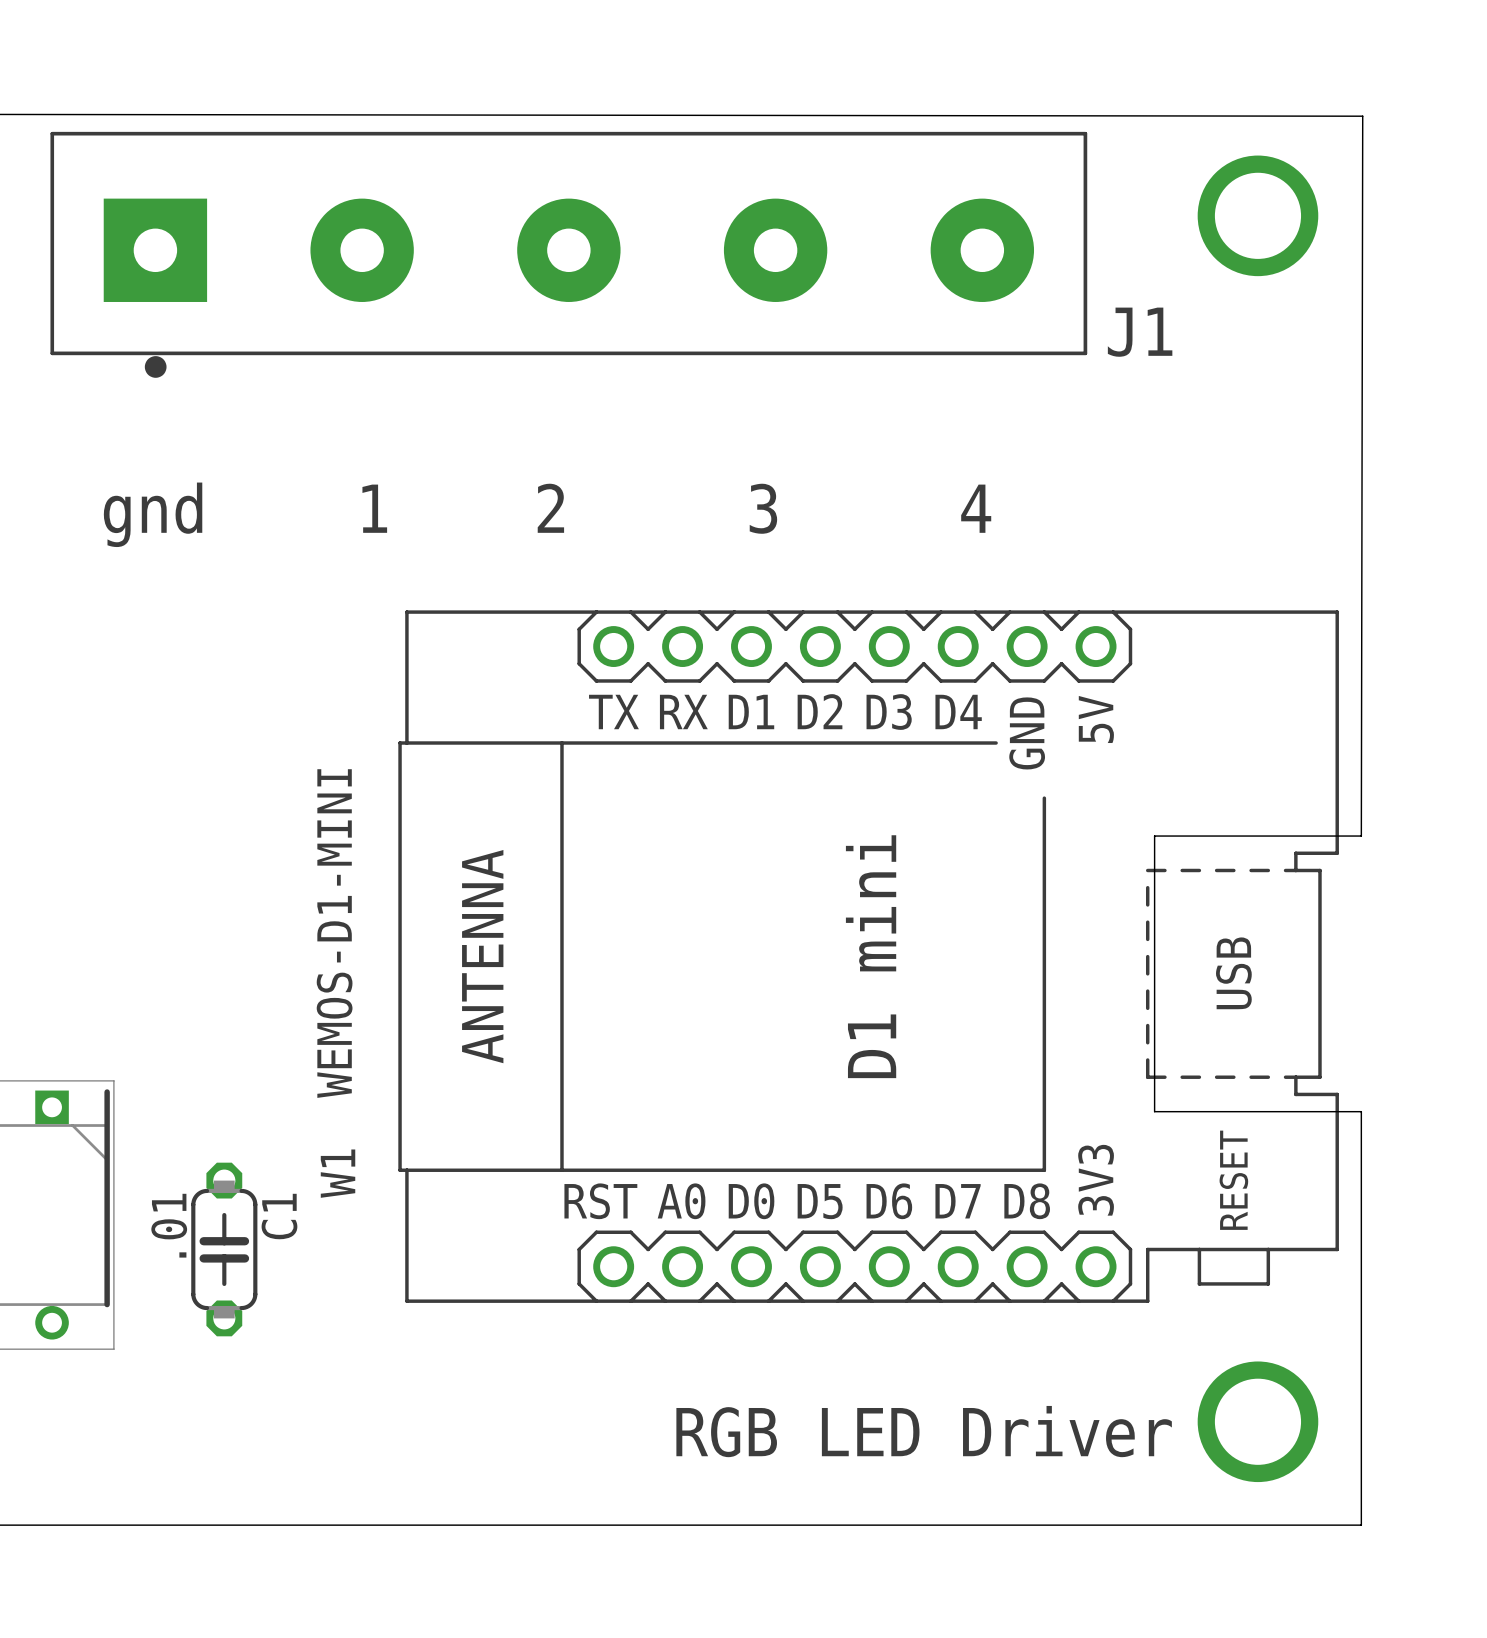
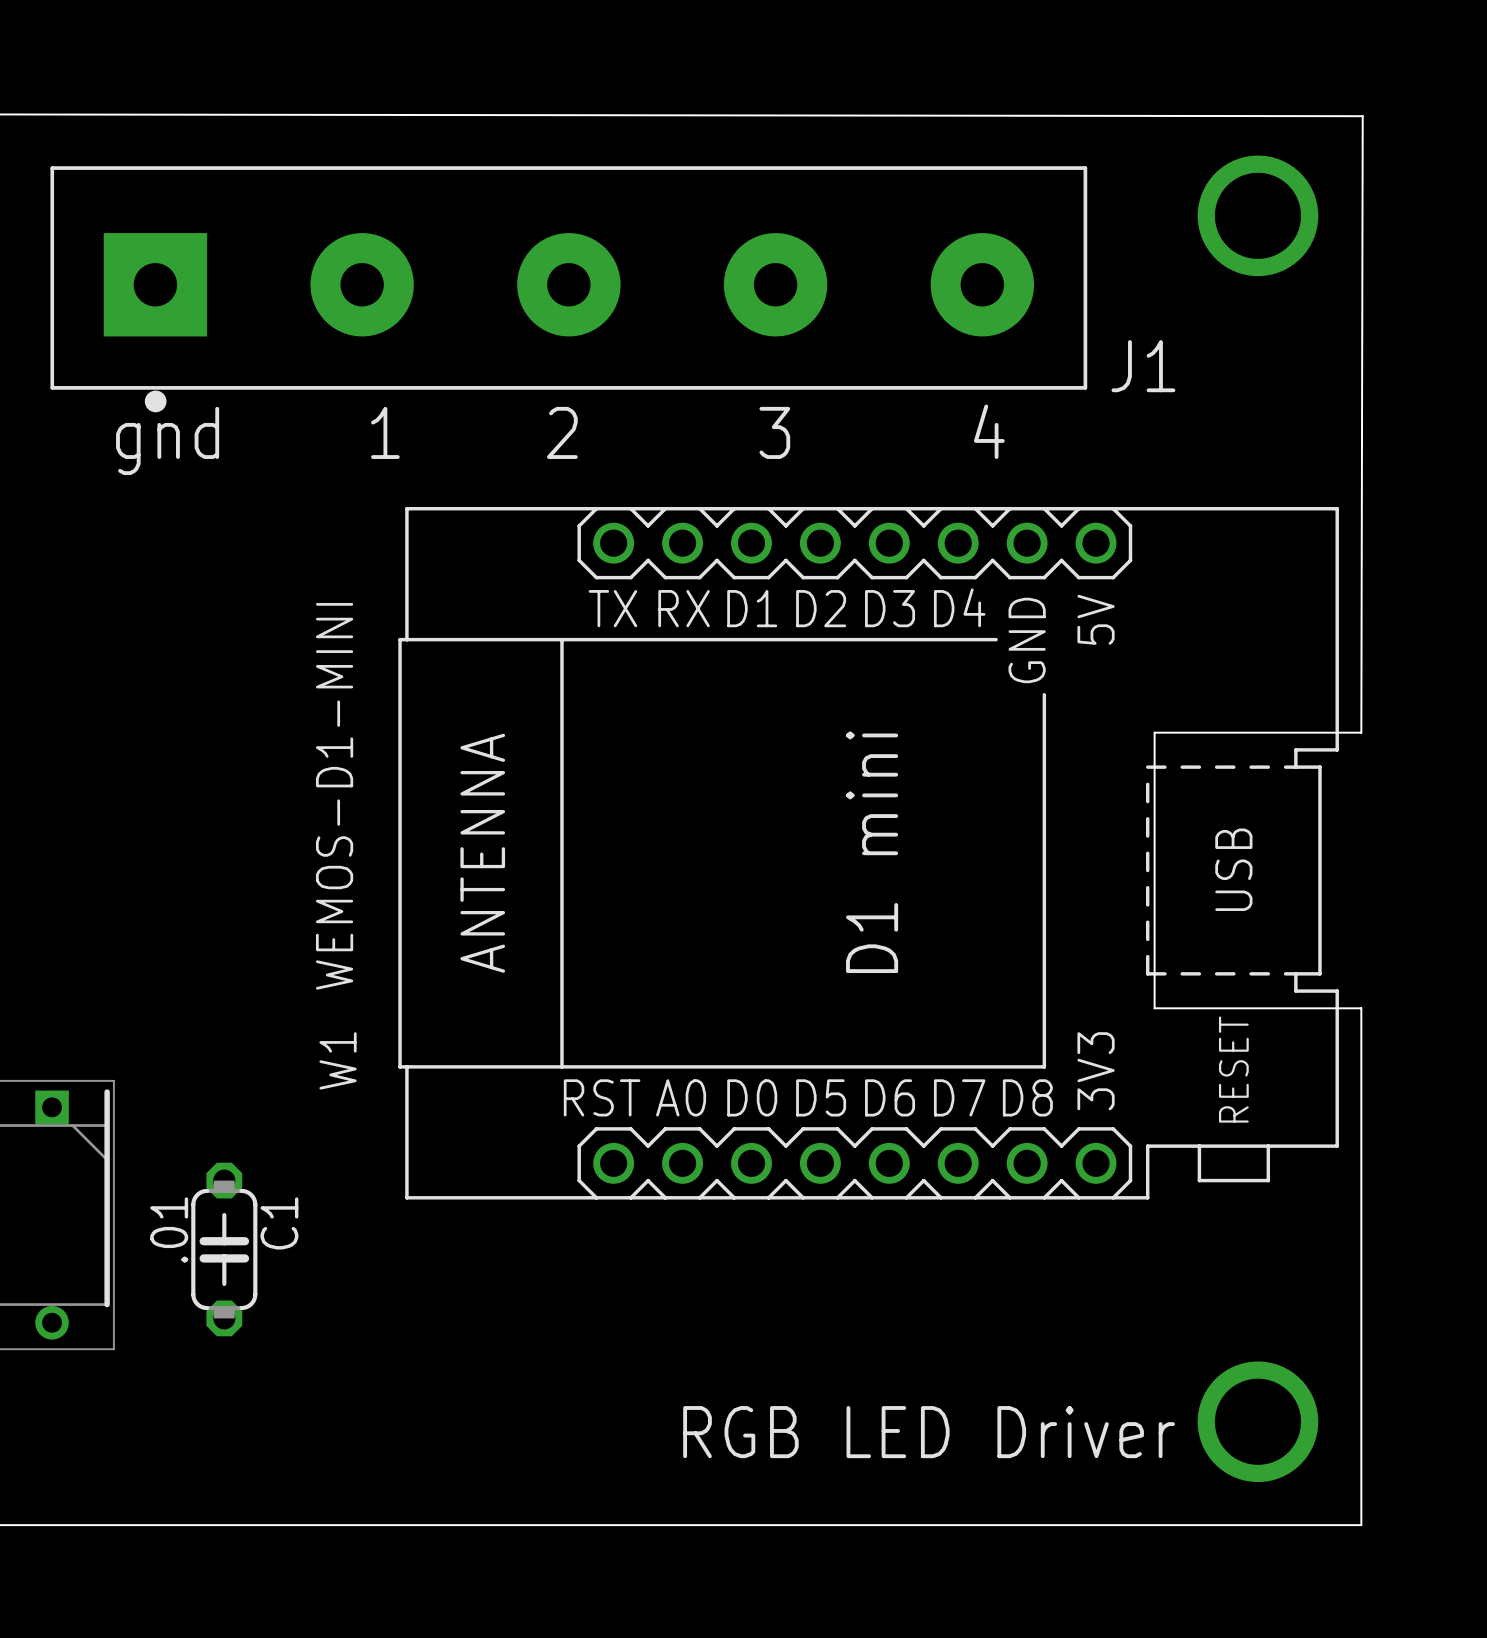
board edge: (1362, 116) (1361, 836) (1154, 836) -> (1362, 116) (1361, 732) (1154, 732) (1154, 836)
J1 position: (568, 254) -> (568, 289)
text position: 1 (374, 508) -> 1 (385, 432)
text position: 2 (550, 508) -> 2 (562, 432)
text position: 3 (763, 508) -> 3 (774, 432)
text position: 4 (976, 508) -> 4 (989, 431)
text position: gnd (153, 514) -> gnd (167, 440)
W1 position: (868, 956) -> (868, 853)
board edge: (1154, 1008) (1154, 1111) (1361, 1111) -> (1154, 1008) (1361, 1008) (1361, 1111)

